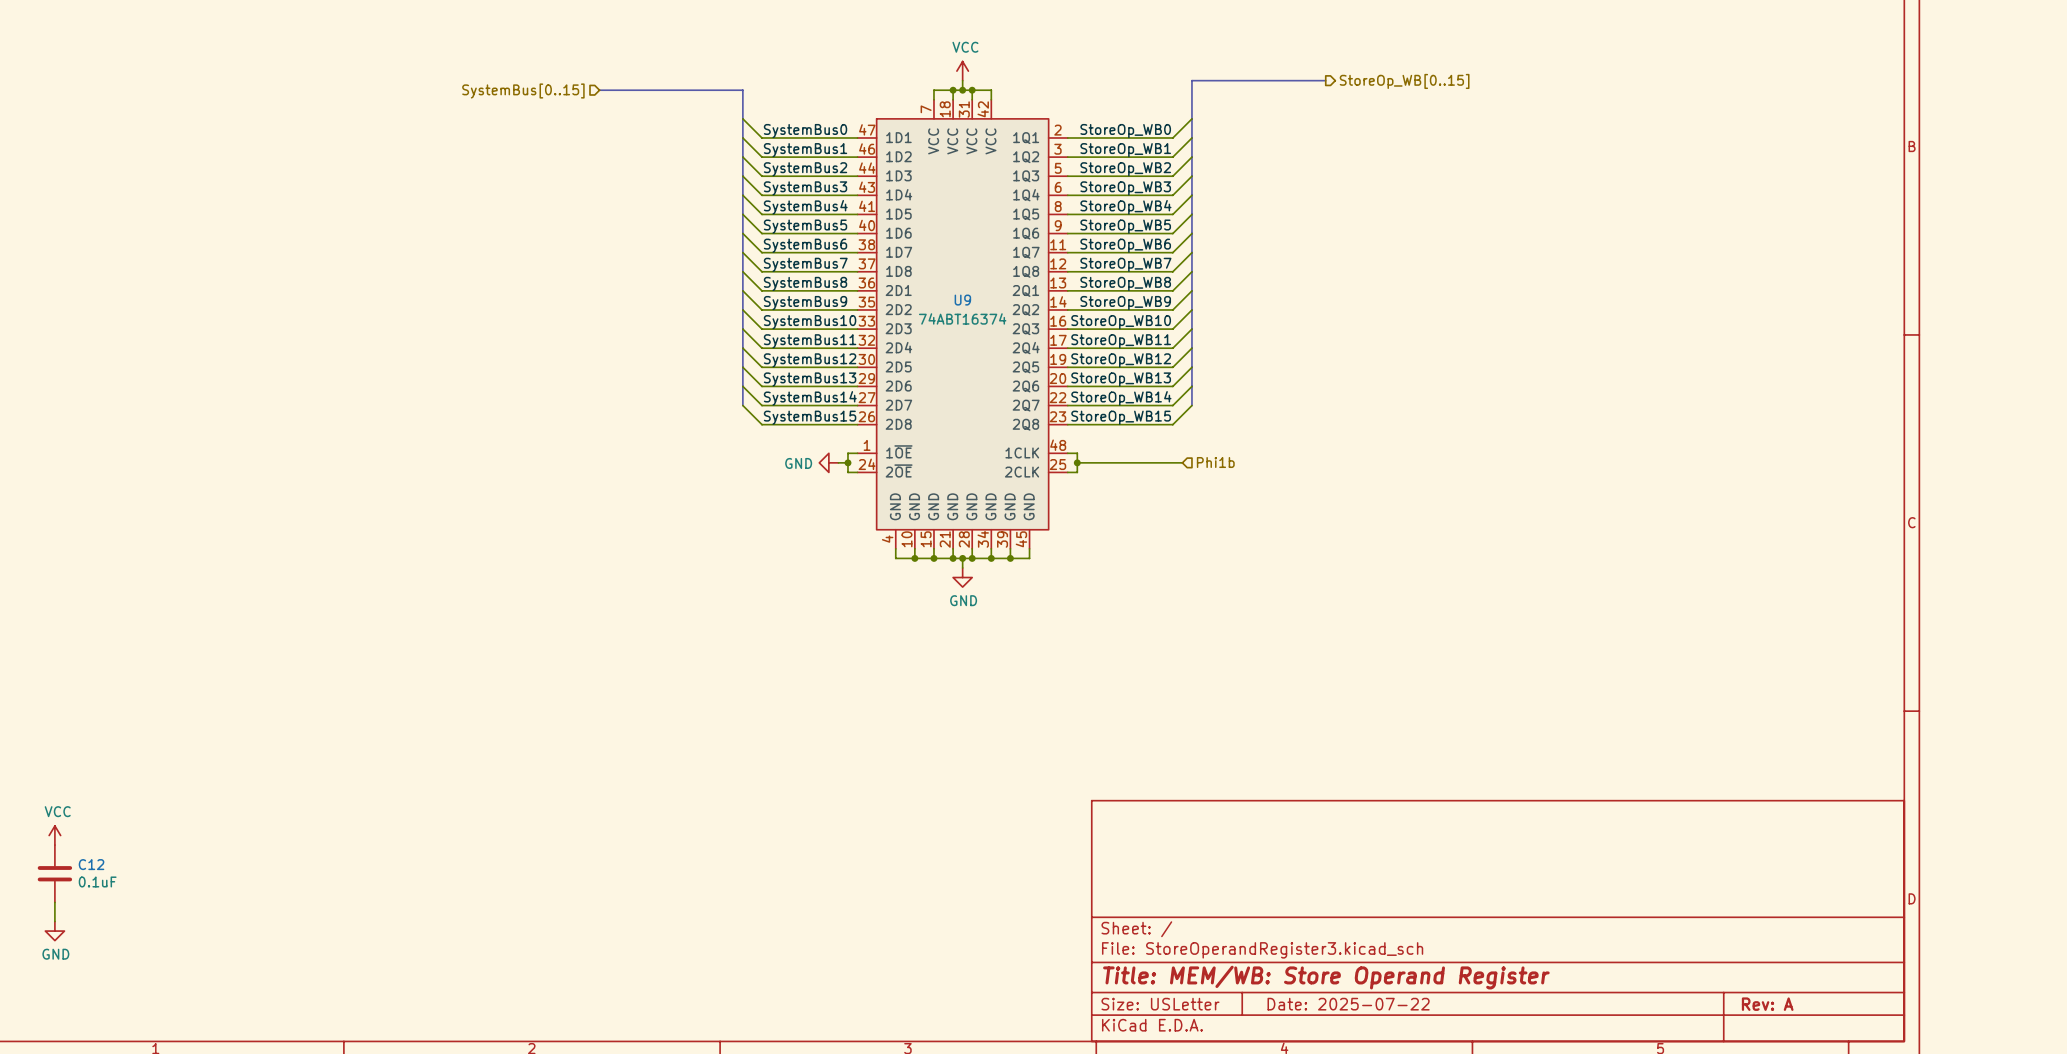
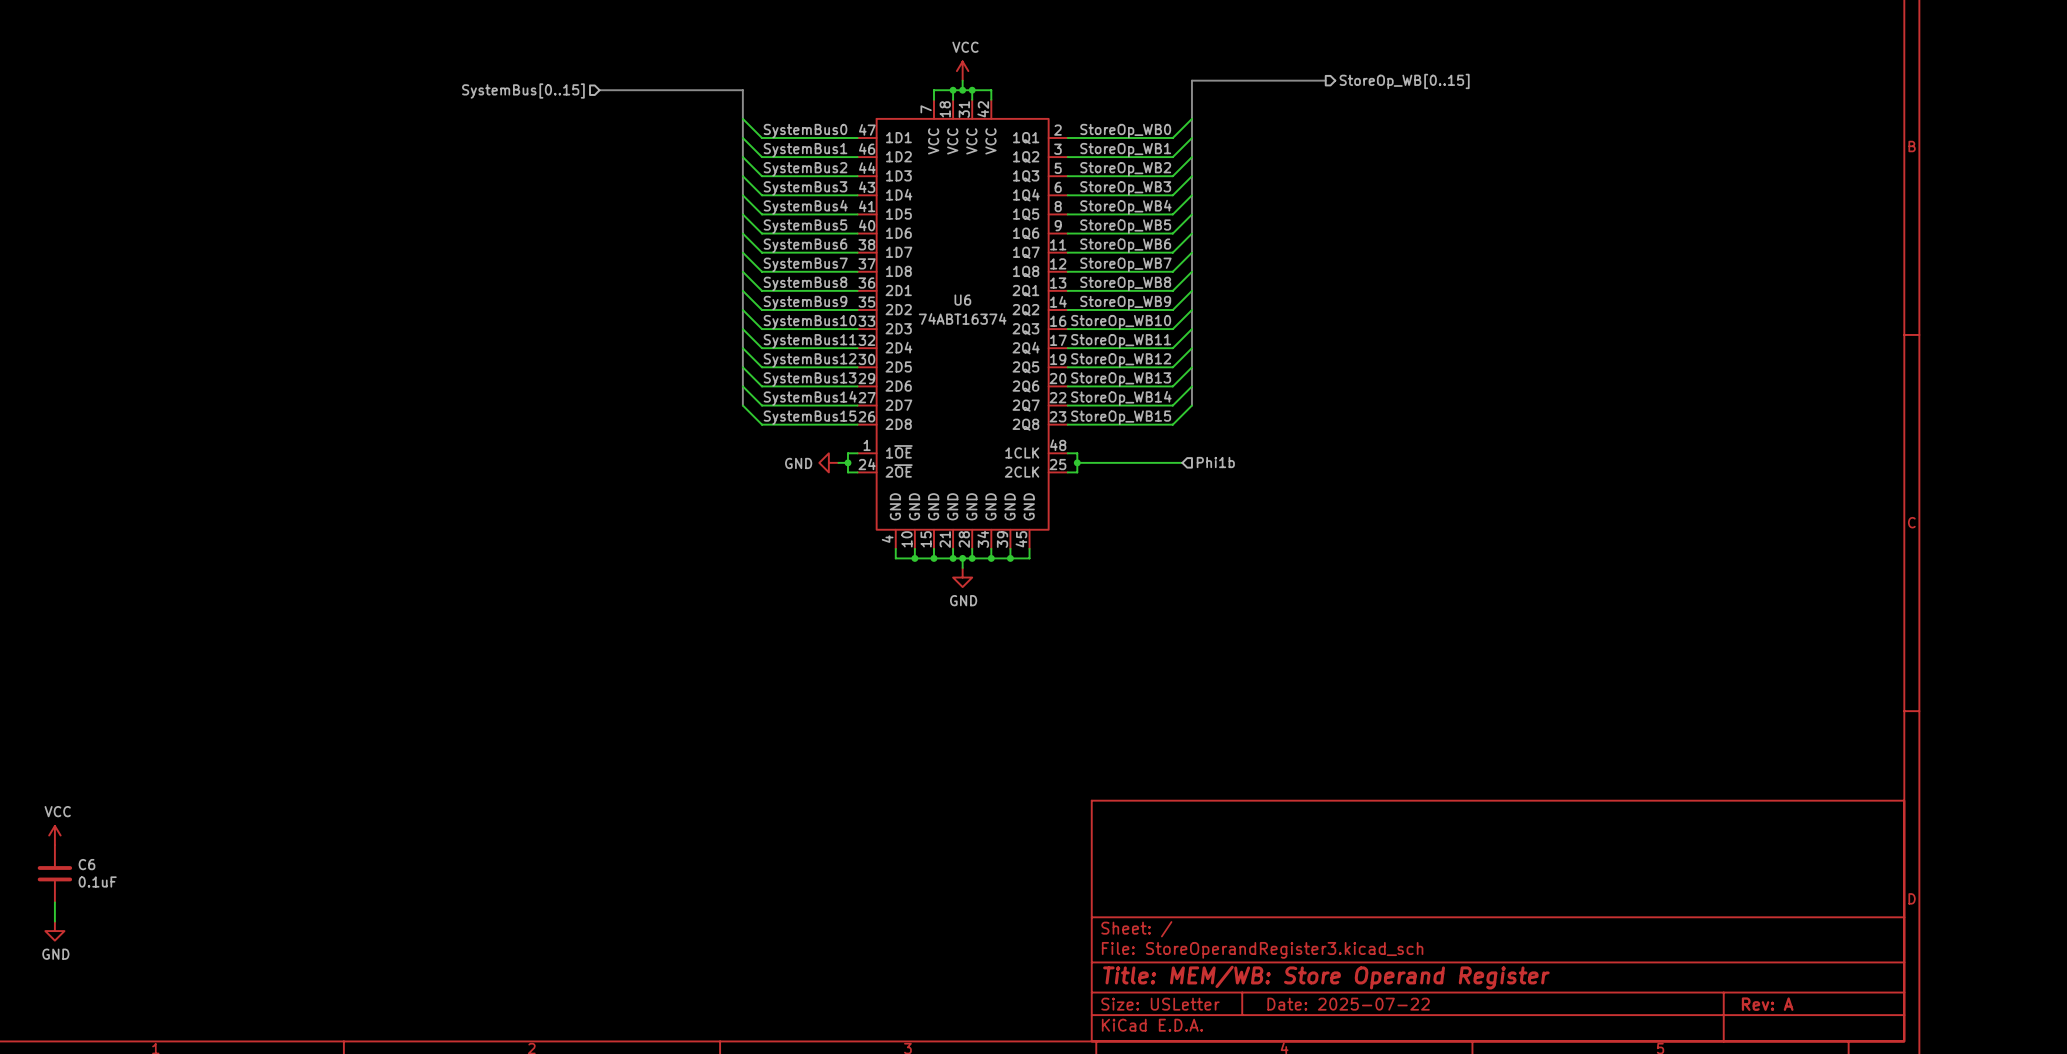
U9 name: U9 (962, 300) -> U6 (962, 300)
C12 name: C12 (91, 864) -> C6 (86, 864)

